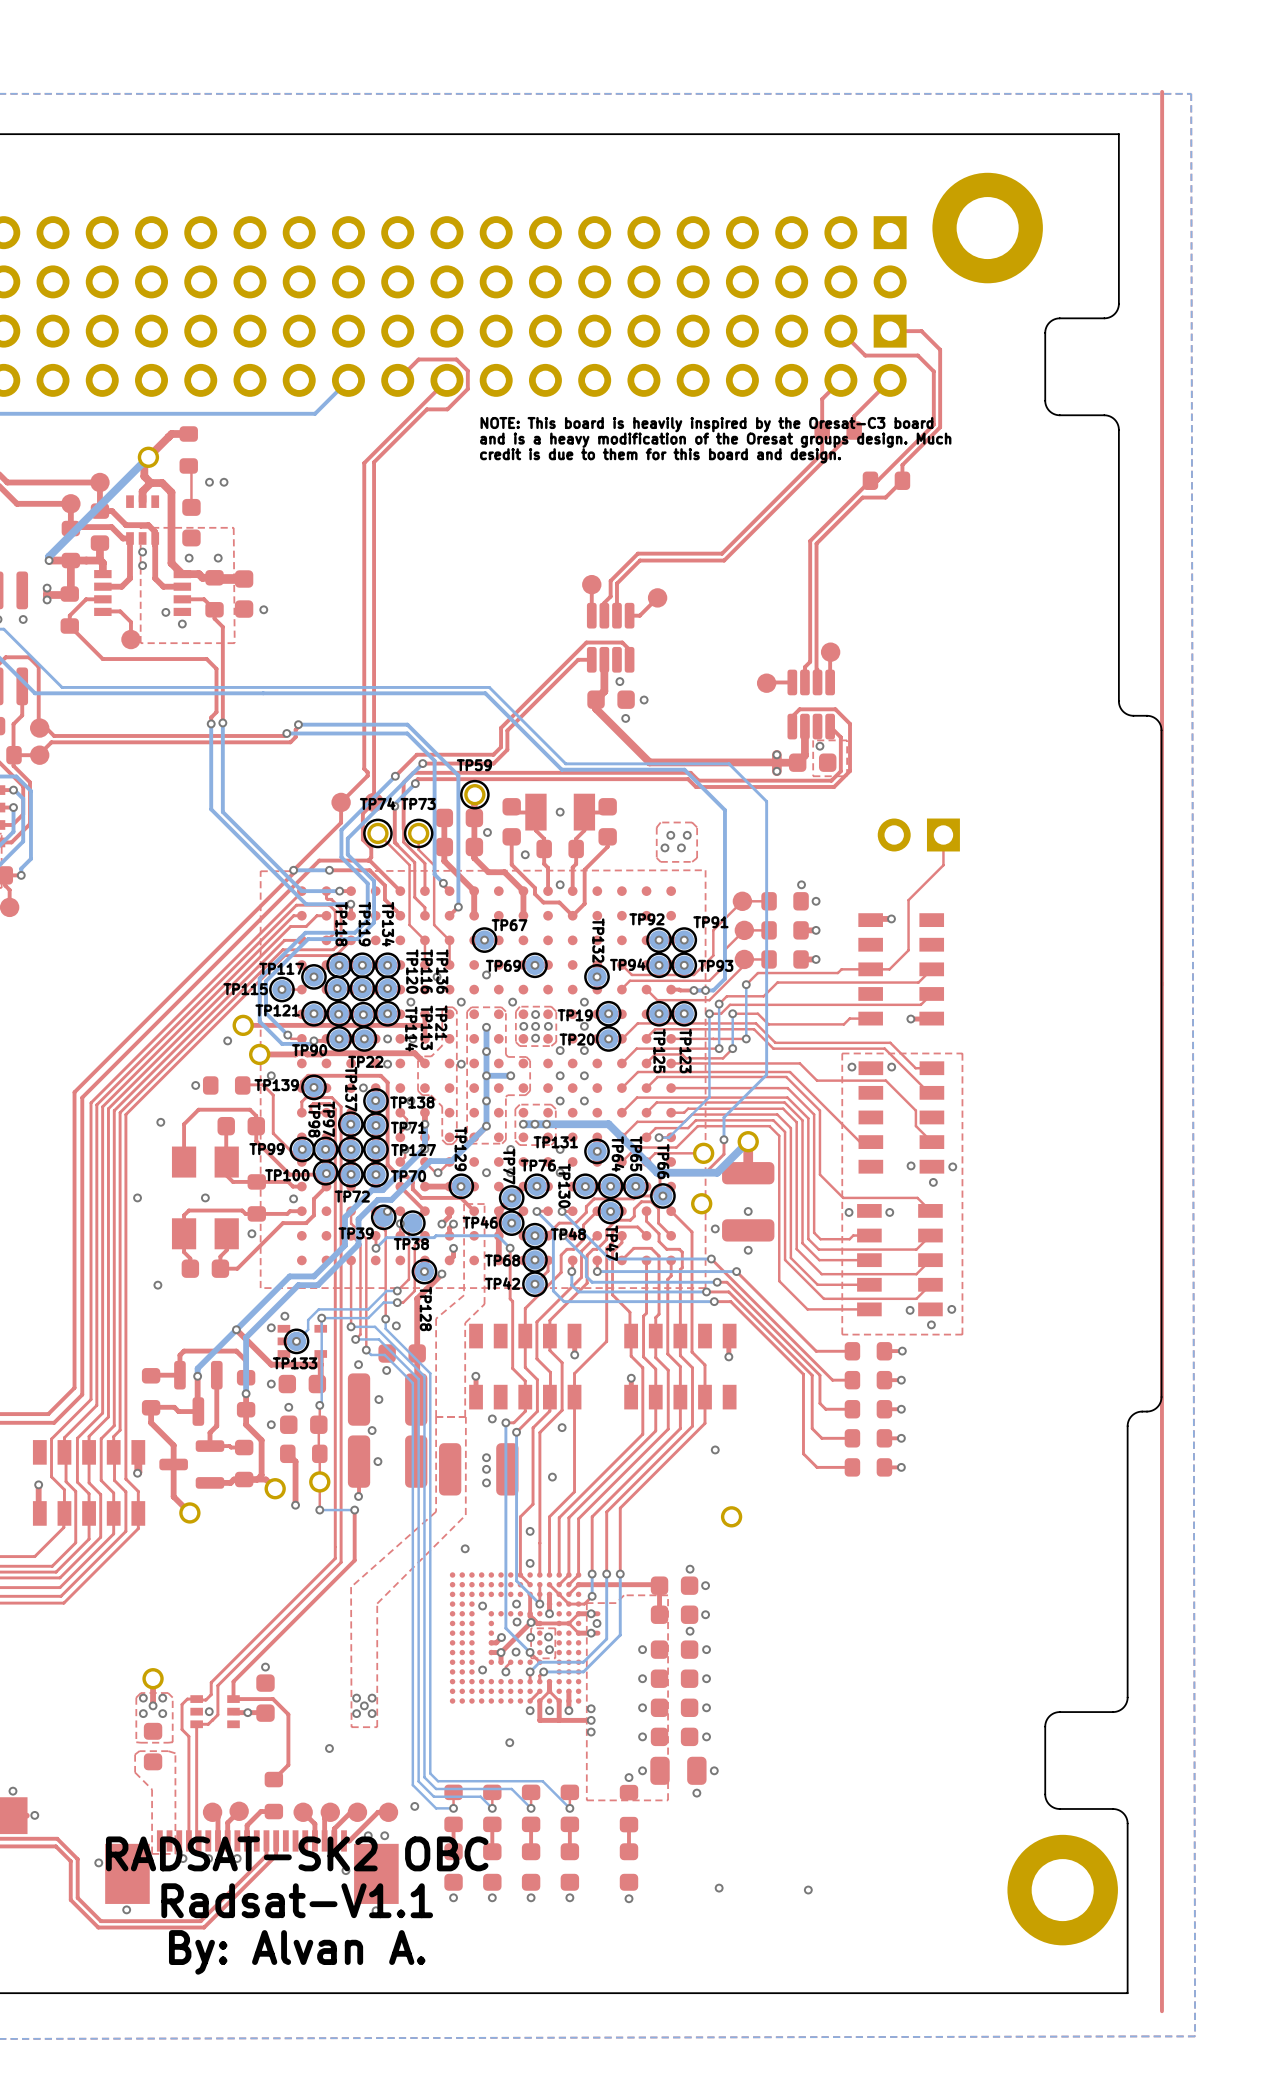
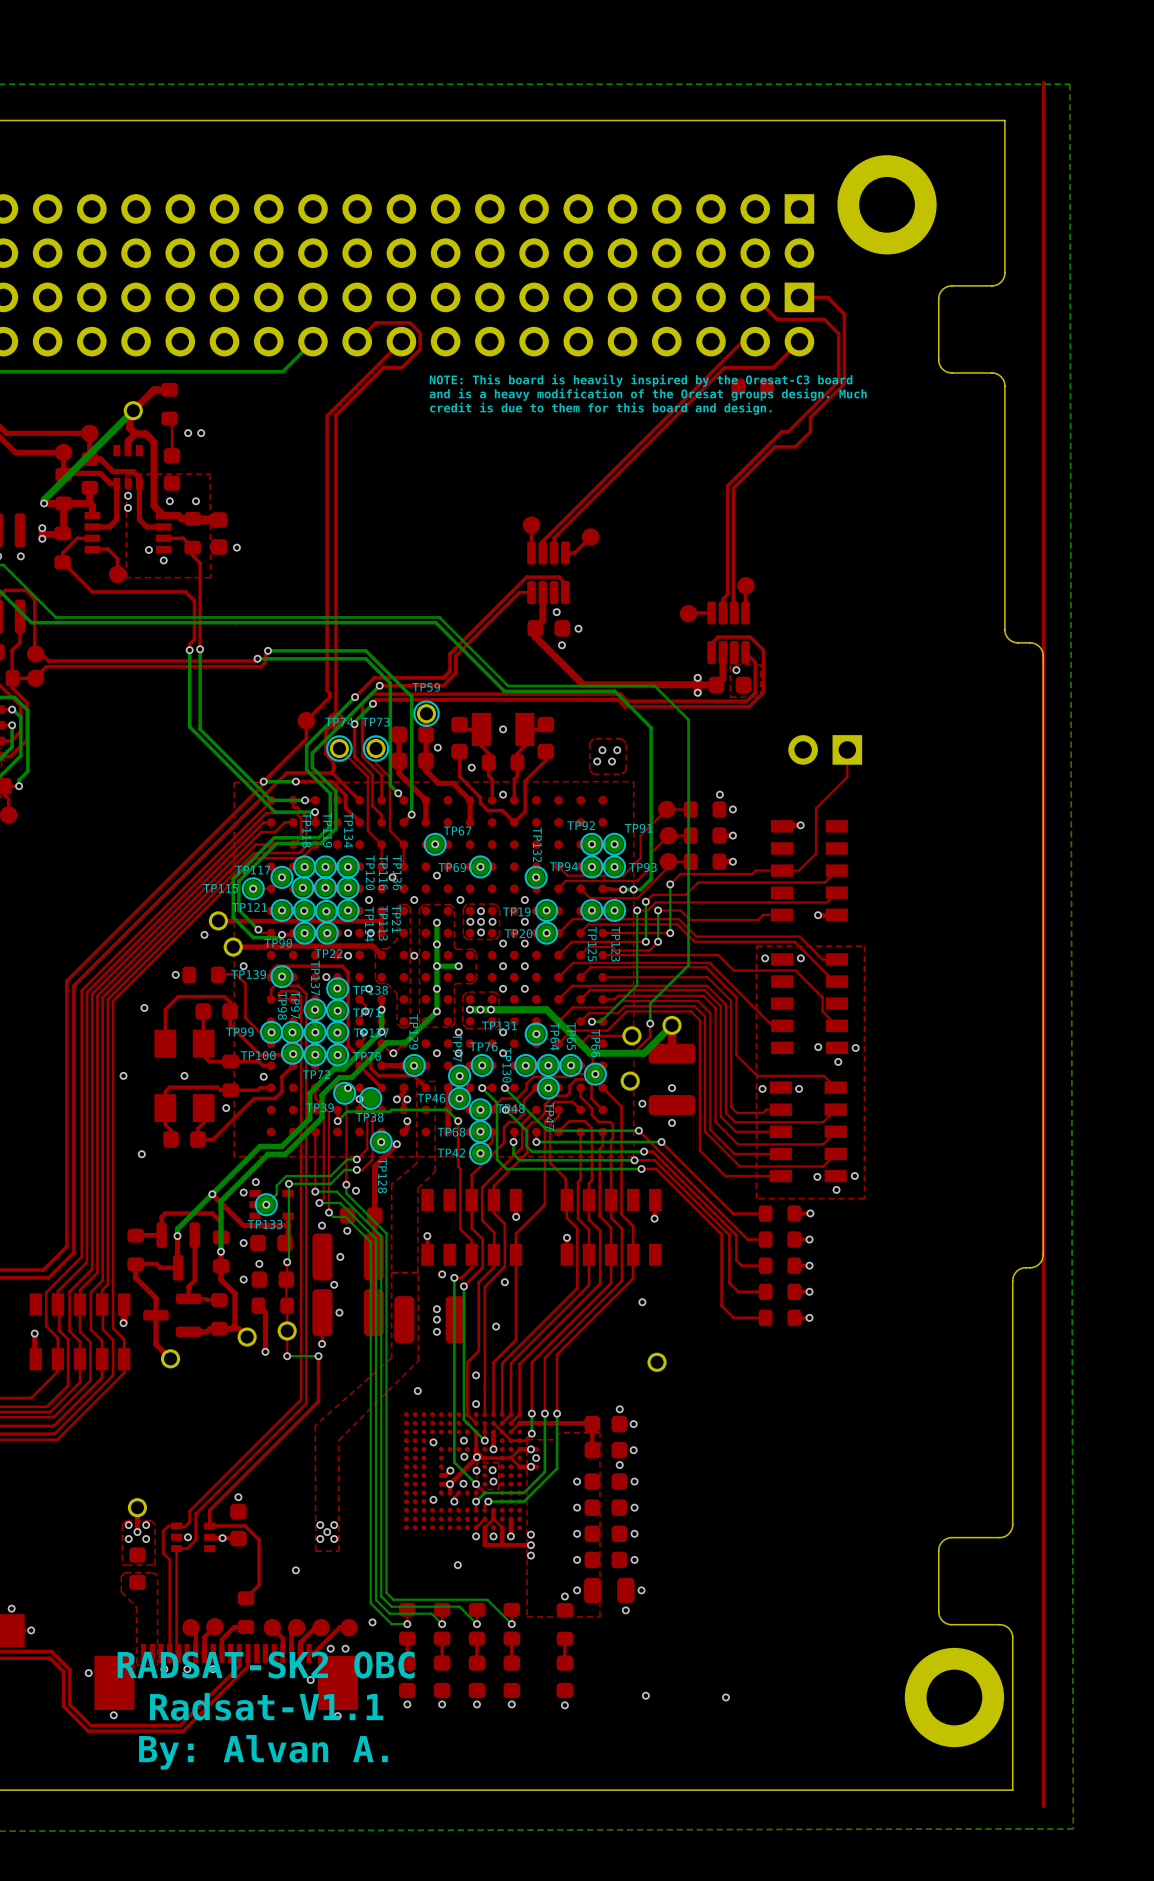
top track: (840, 380) (822, 399) (822, 453) (722, 553) (637, 553) (610, 580) (610, 596) -> (755, 341) (742, 341) (548, 535)
top track: (861, 409) (854, 416) (854, 430) (724, 560) (639, 560) (616, 583) (616, 599) -> (773, 367) (724, 367) (554, 538)
part: (886, 480) -> none

